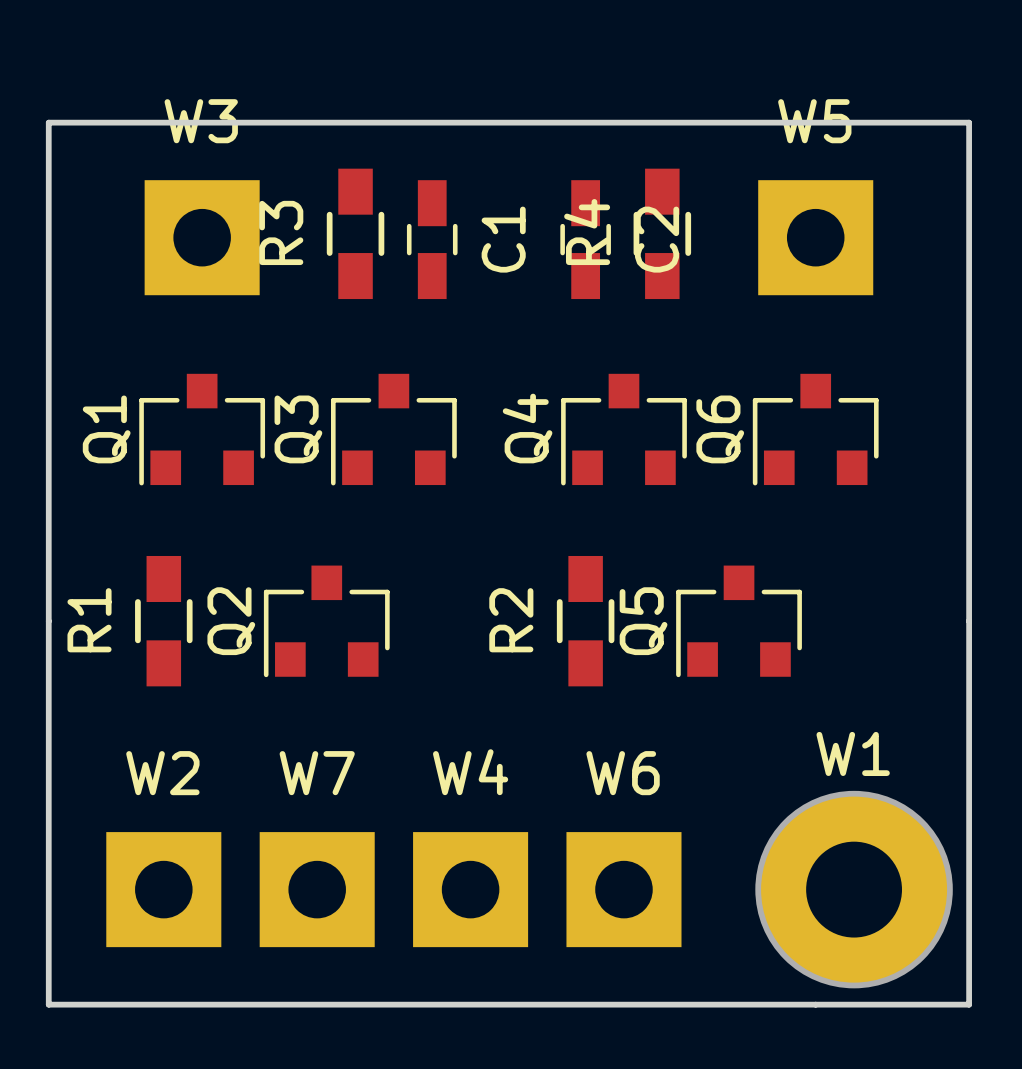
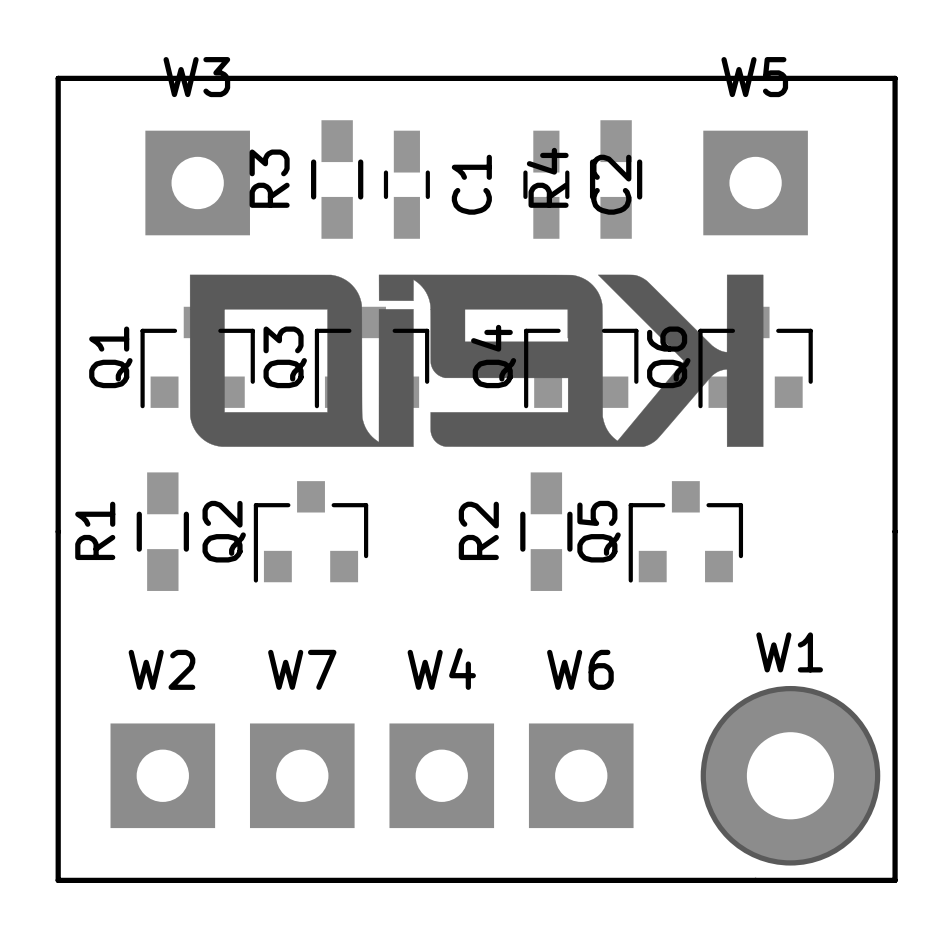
drawing: none -> [189, 274, 764, 447]

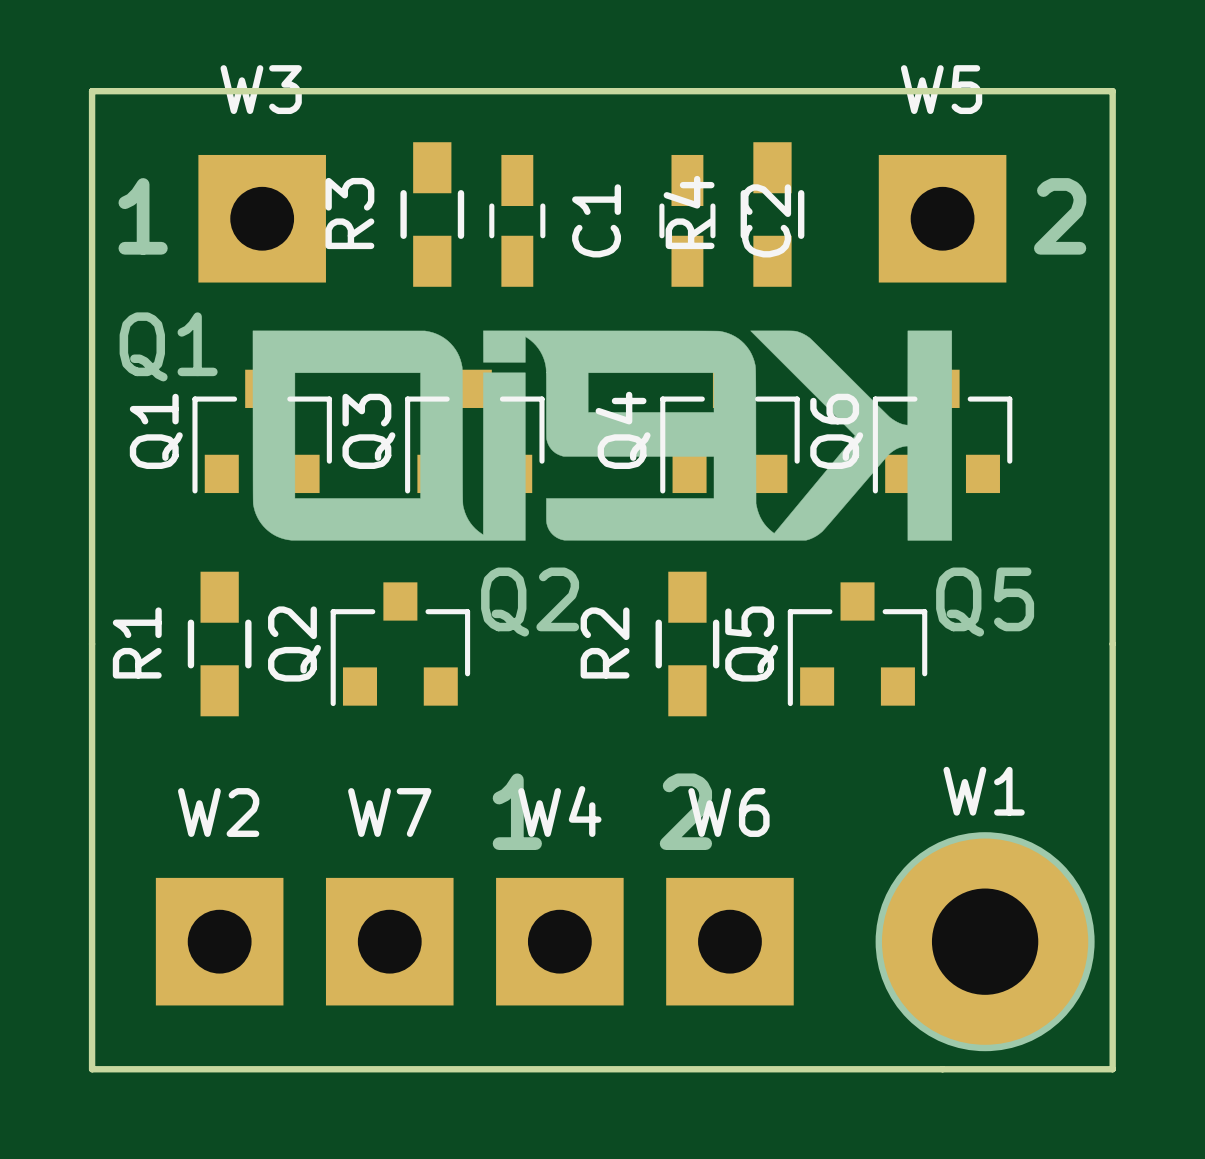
text: none -> 1 (143, 216)
text: none -> 2 (1060, 216)
text: none -> Q1 (168, 346)
text: none -> Q2 (530, 602)
text: none -> Q5 (985, 602)
text: none -> 1 (517, 811)
text: none -> 2 (685, 811)

